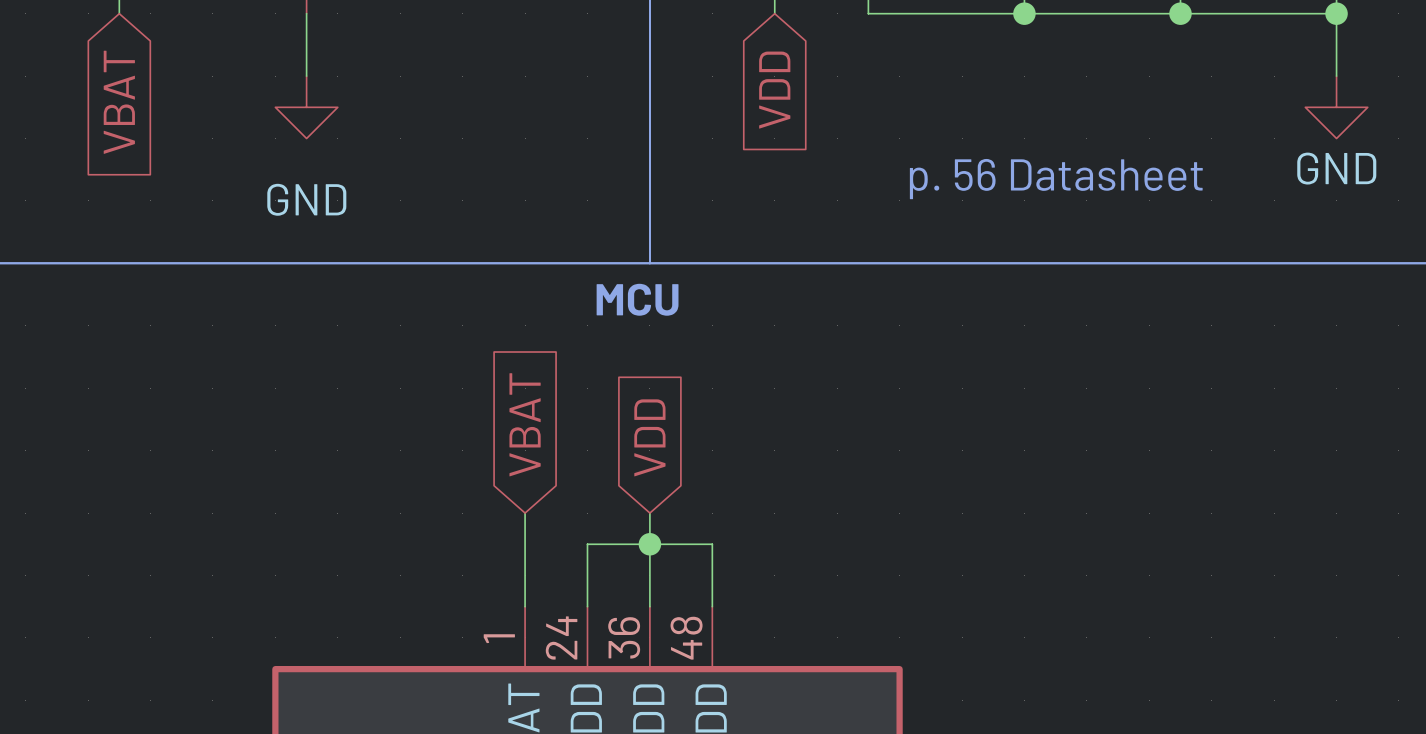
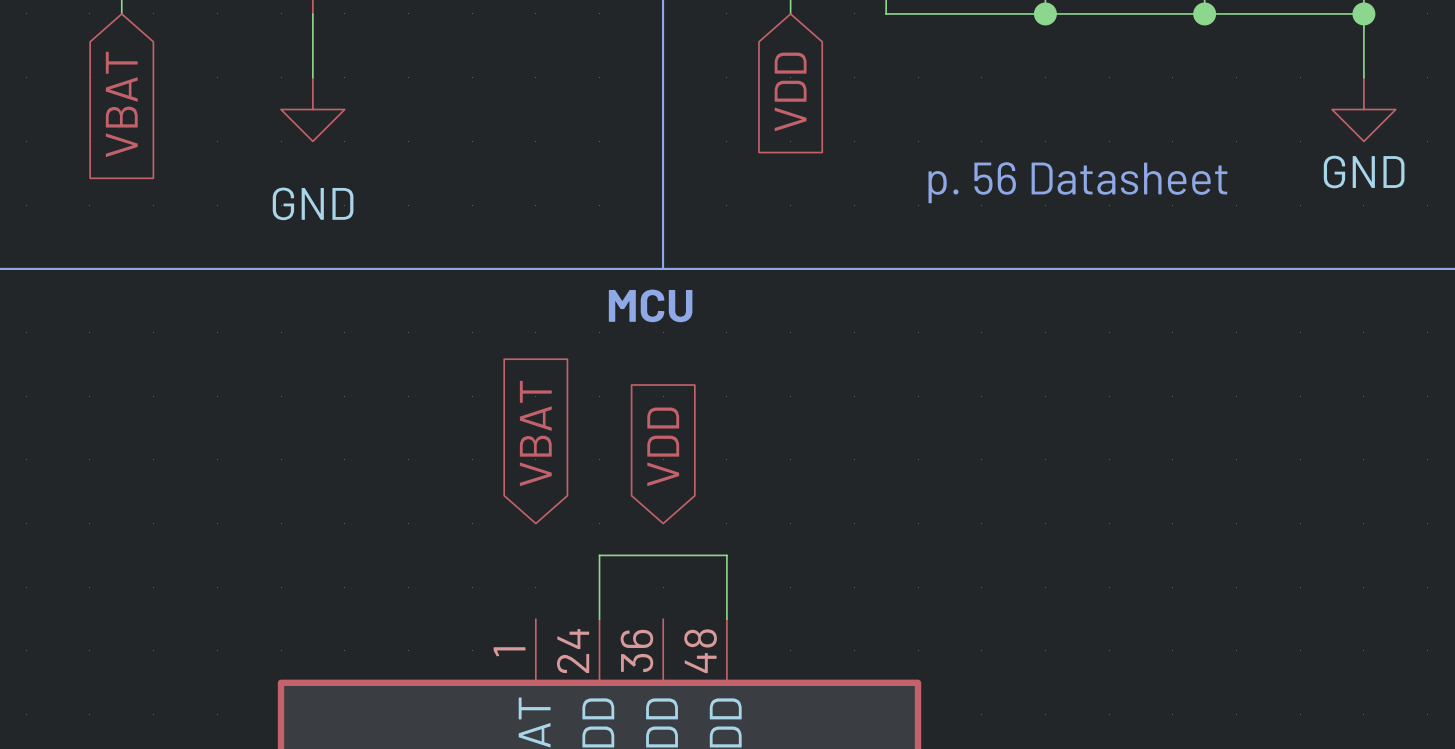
wire: (525, 513) (525, 606) -> none
wire: (649, 513) (649, 606) -> none
junction: (649, 544) -> none

